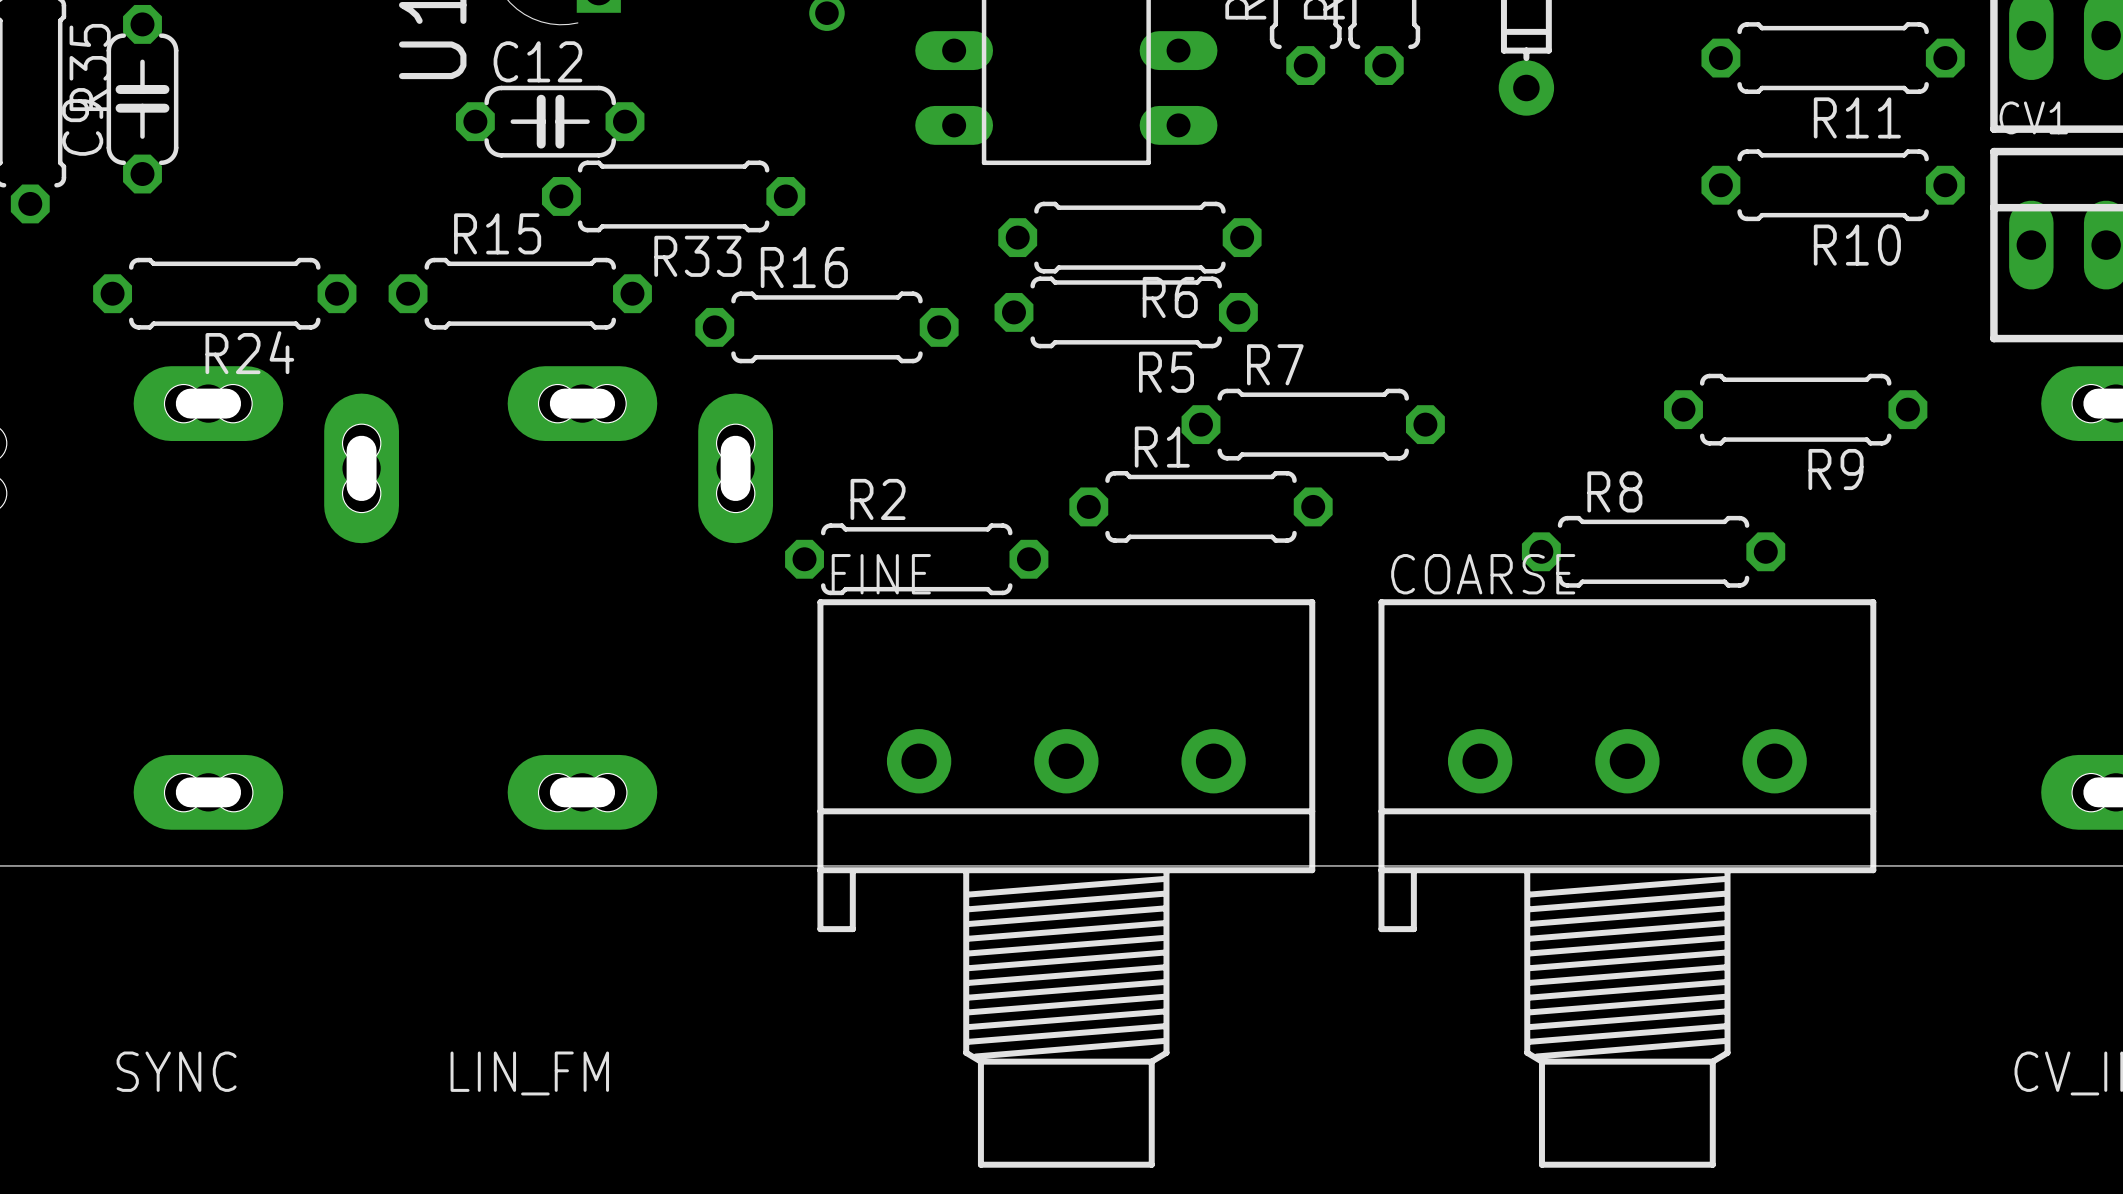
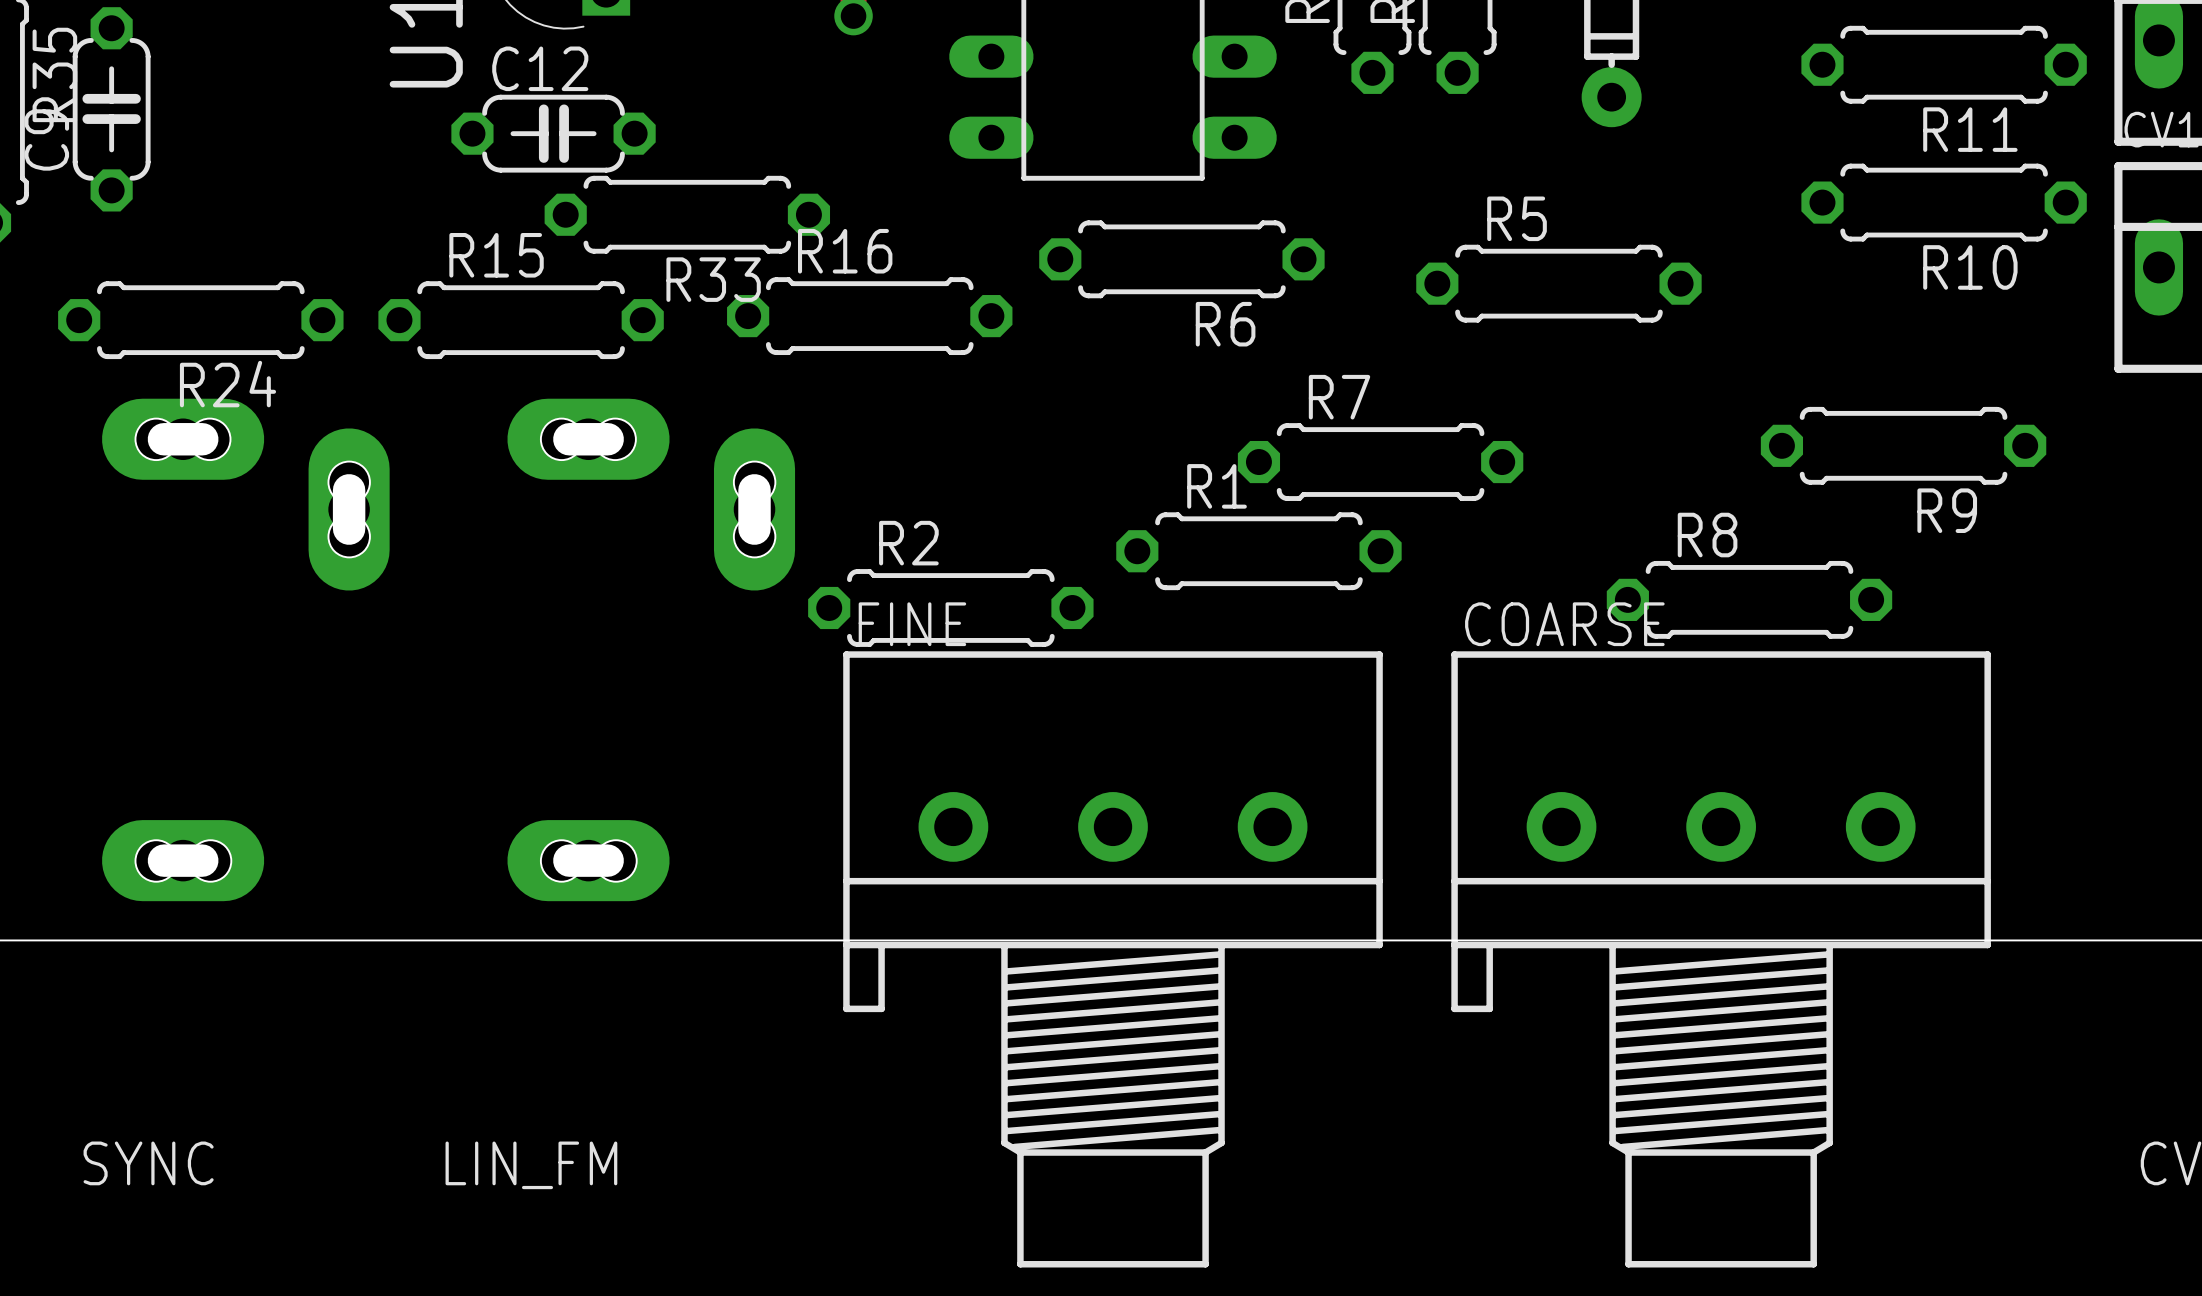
R5 position: (1126, 312) -> (1558, 283)
R16 position: (826, 327) -> (869, 316)
R5 name position: R5 (1166, 372) -> R5 (1517, 218)

